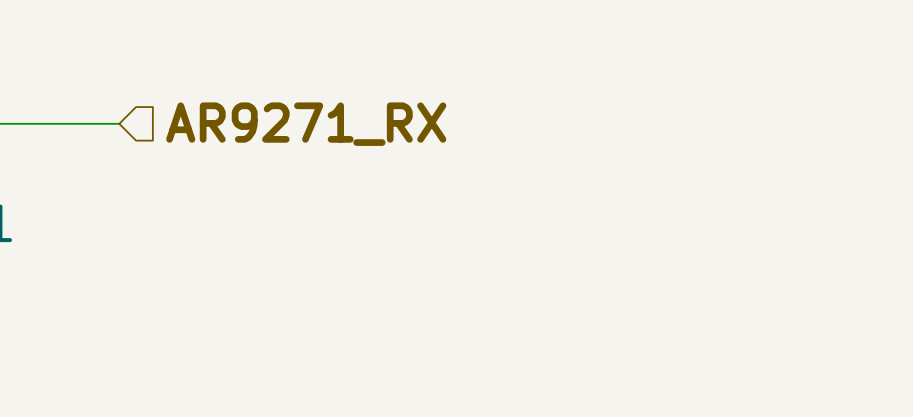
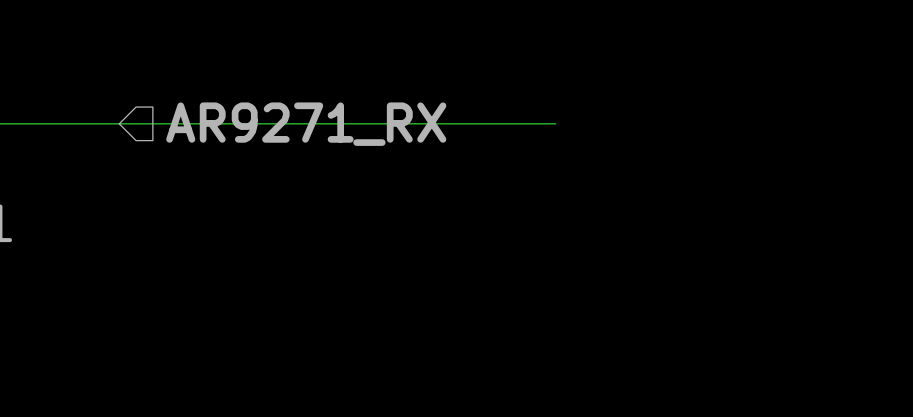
wire: none -> (119, 123) (555, 123)

